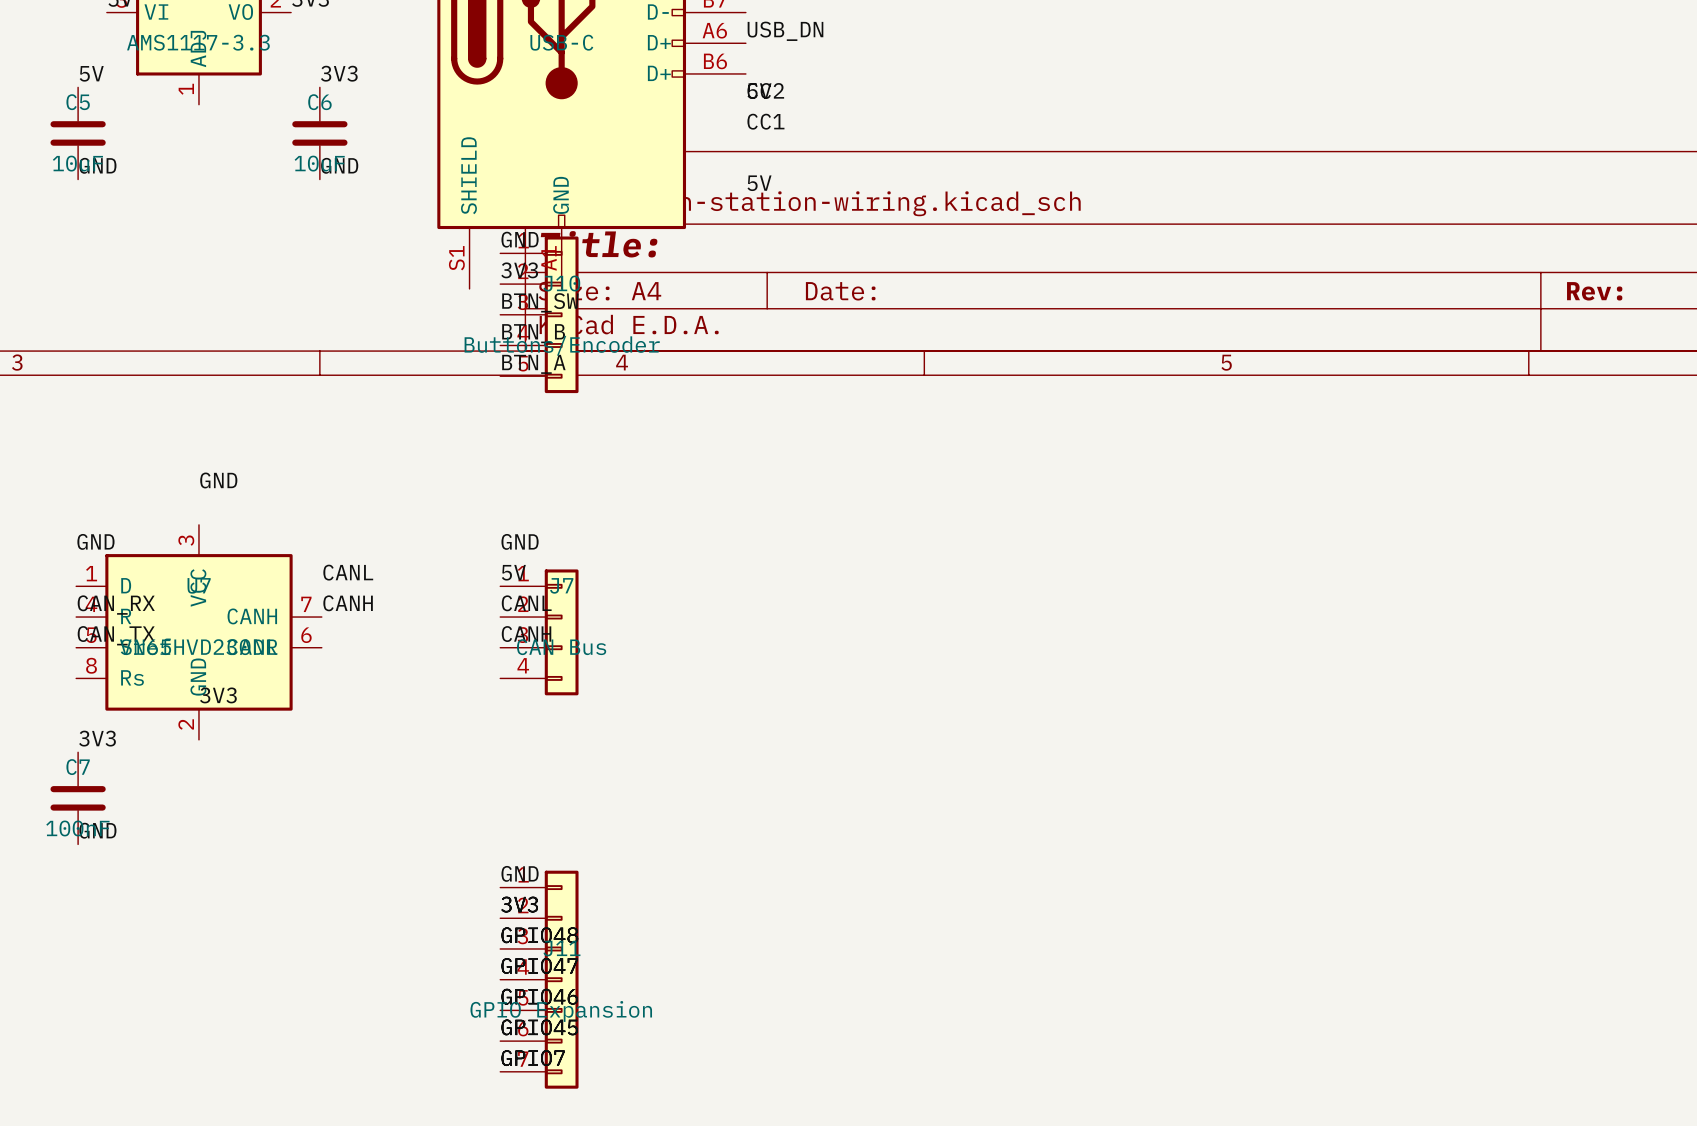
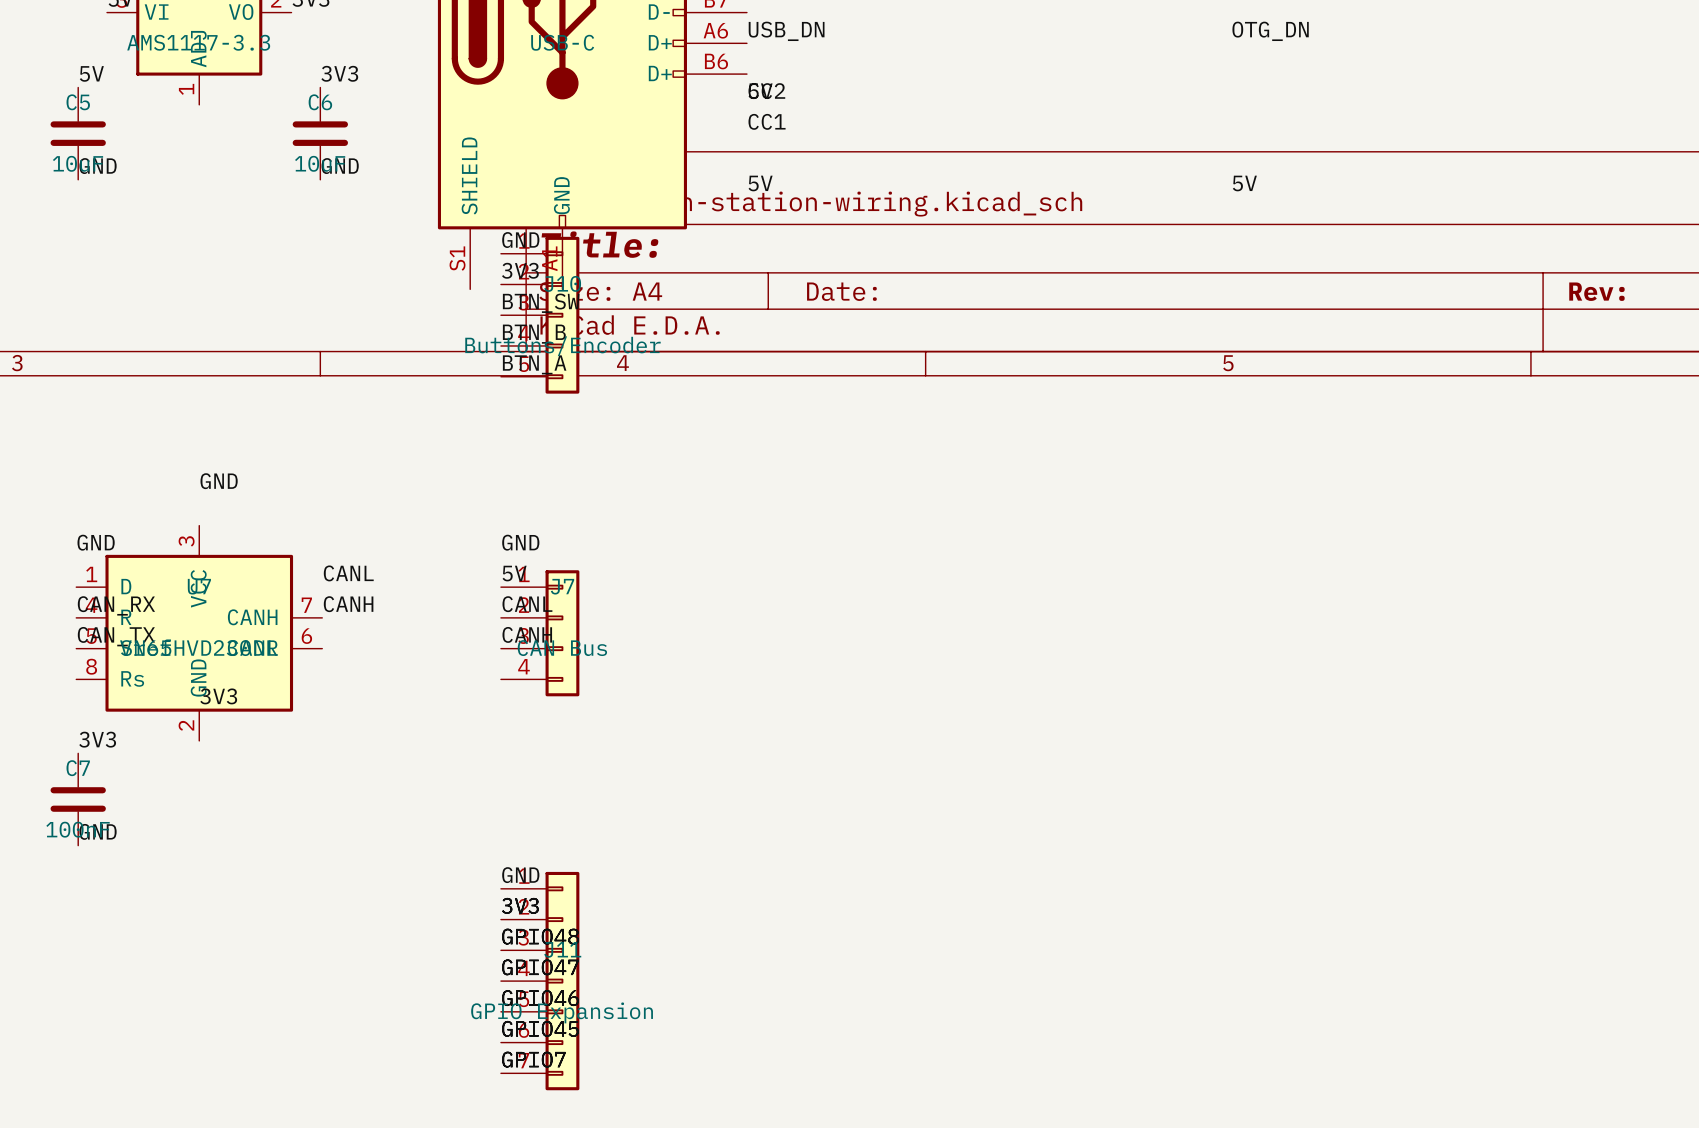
label: none -> OTG_DN (1270, 31)
label: none -> 5V (1244, 183)

